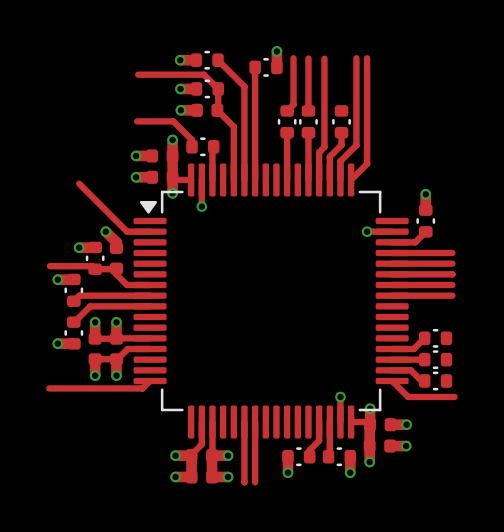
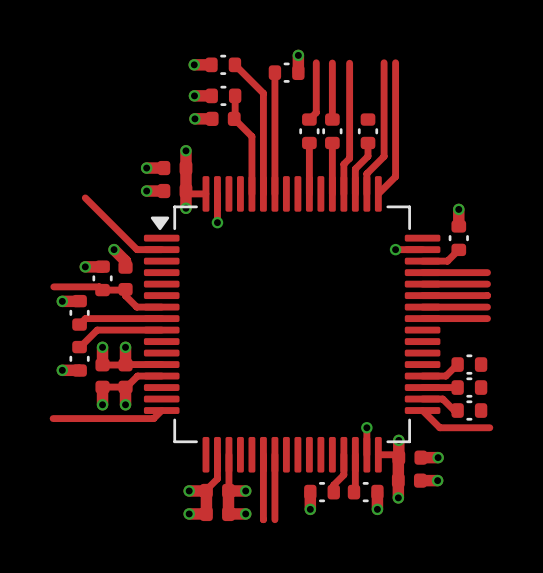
top track: (138, 74) (203, 74) (218, 88) -> none
top track: (137, 121) (173, 121) (192, 139) (192, 146) -> none
part: (202, 146) -> none
top track: (213, 146) (212, 179) -> none

